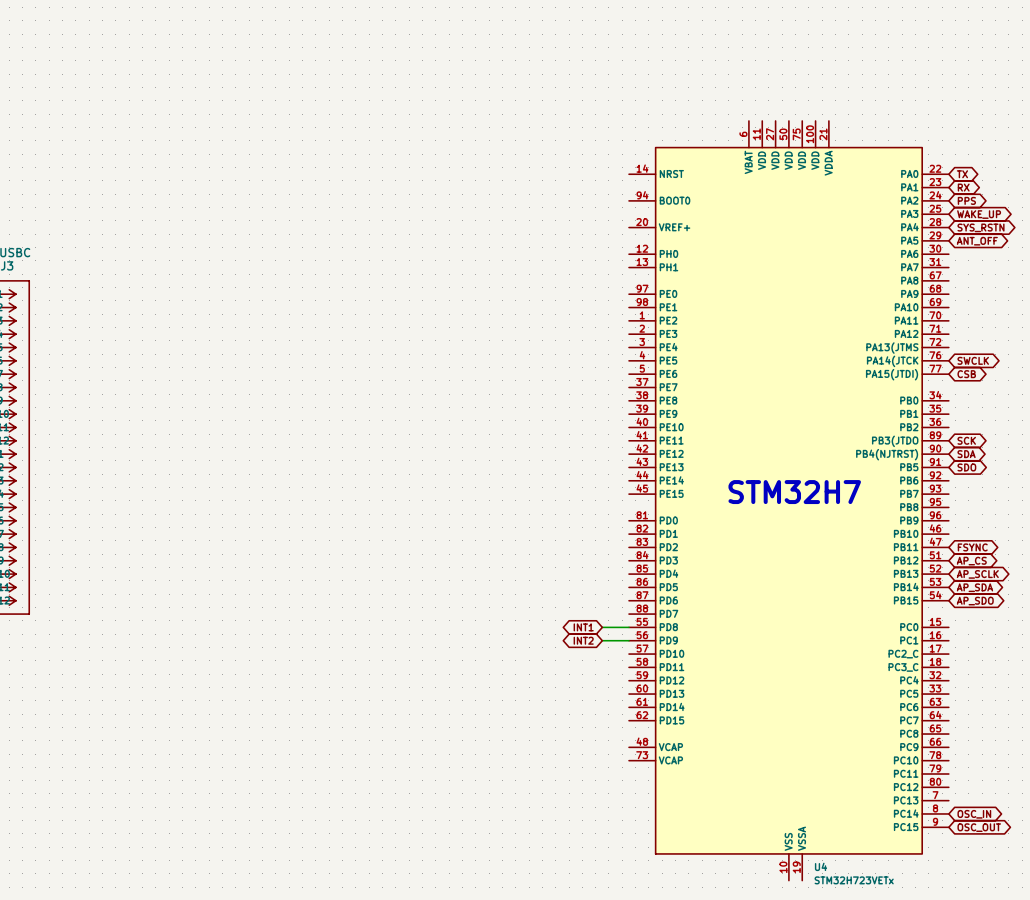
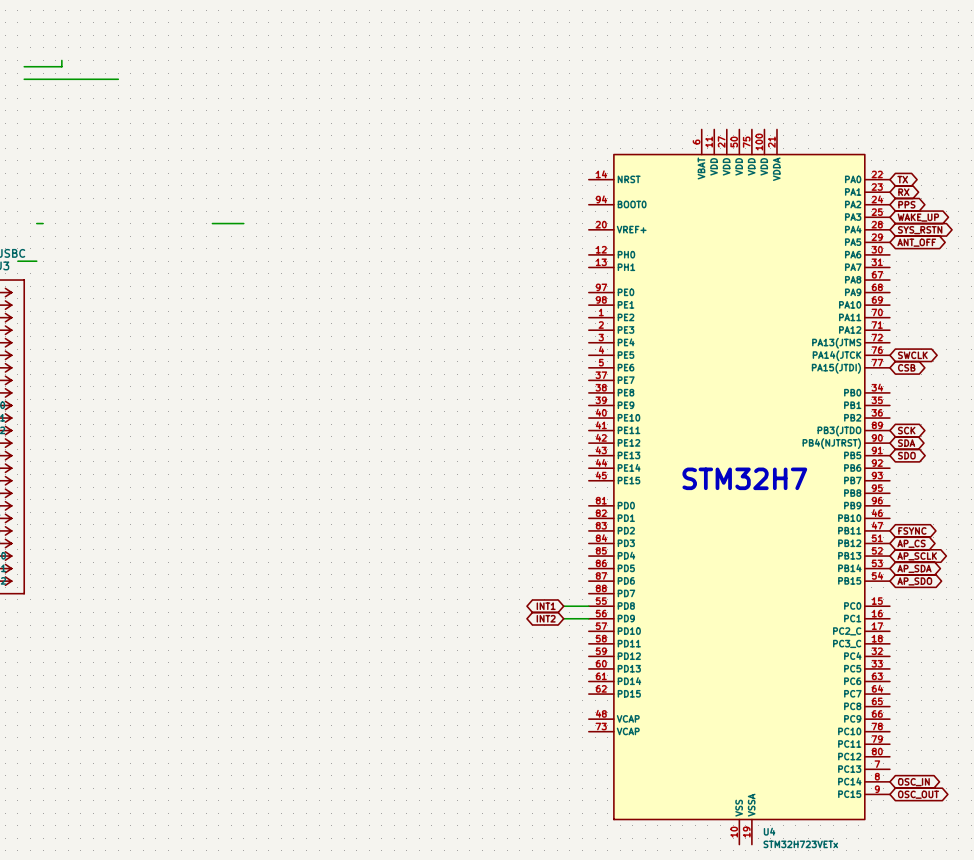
wire: none -> (61, 60) (61, 66) (24, 66)
wire: none -> (24, 79) (118, 79)
wire: none -> (36, 223) (43, 223)
wire: none -> (212, 223) (243, 223)
wire: none -> (17, 261) (36, 261)

